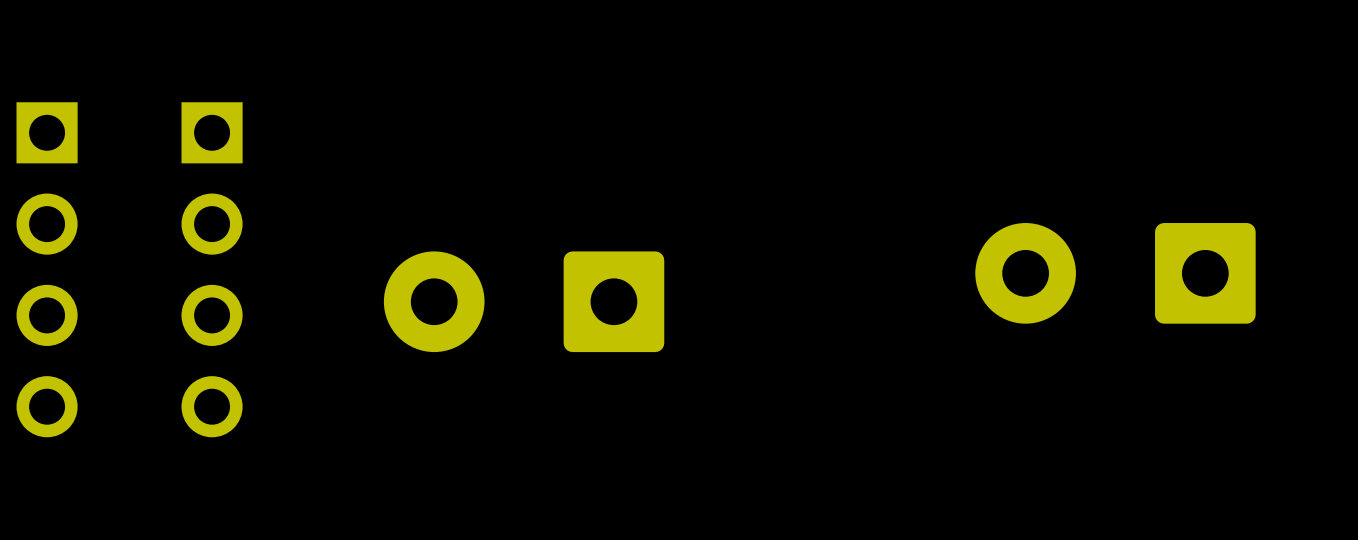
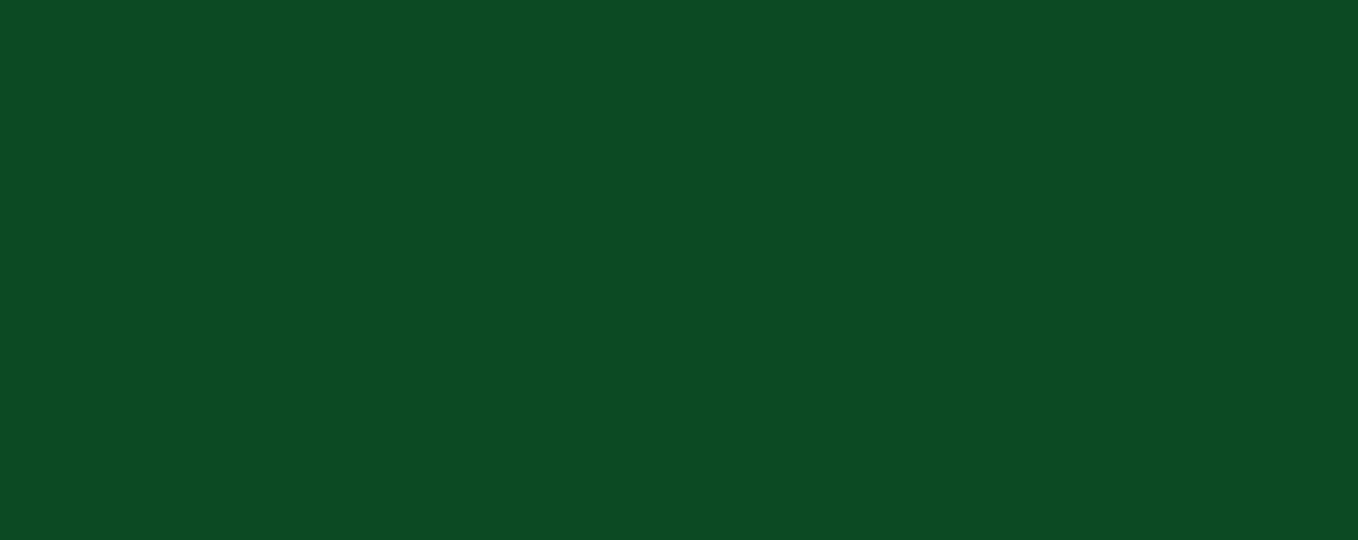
part: (47, 269) -> none
part: (212, 269) -> none
part: (1115, 273) -> none
part: (524, 301) -> none

